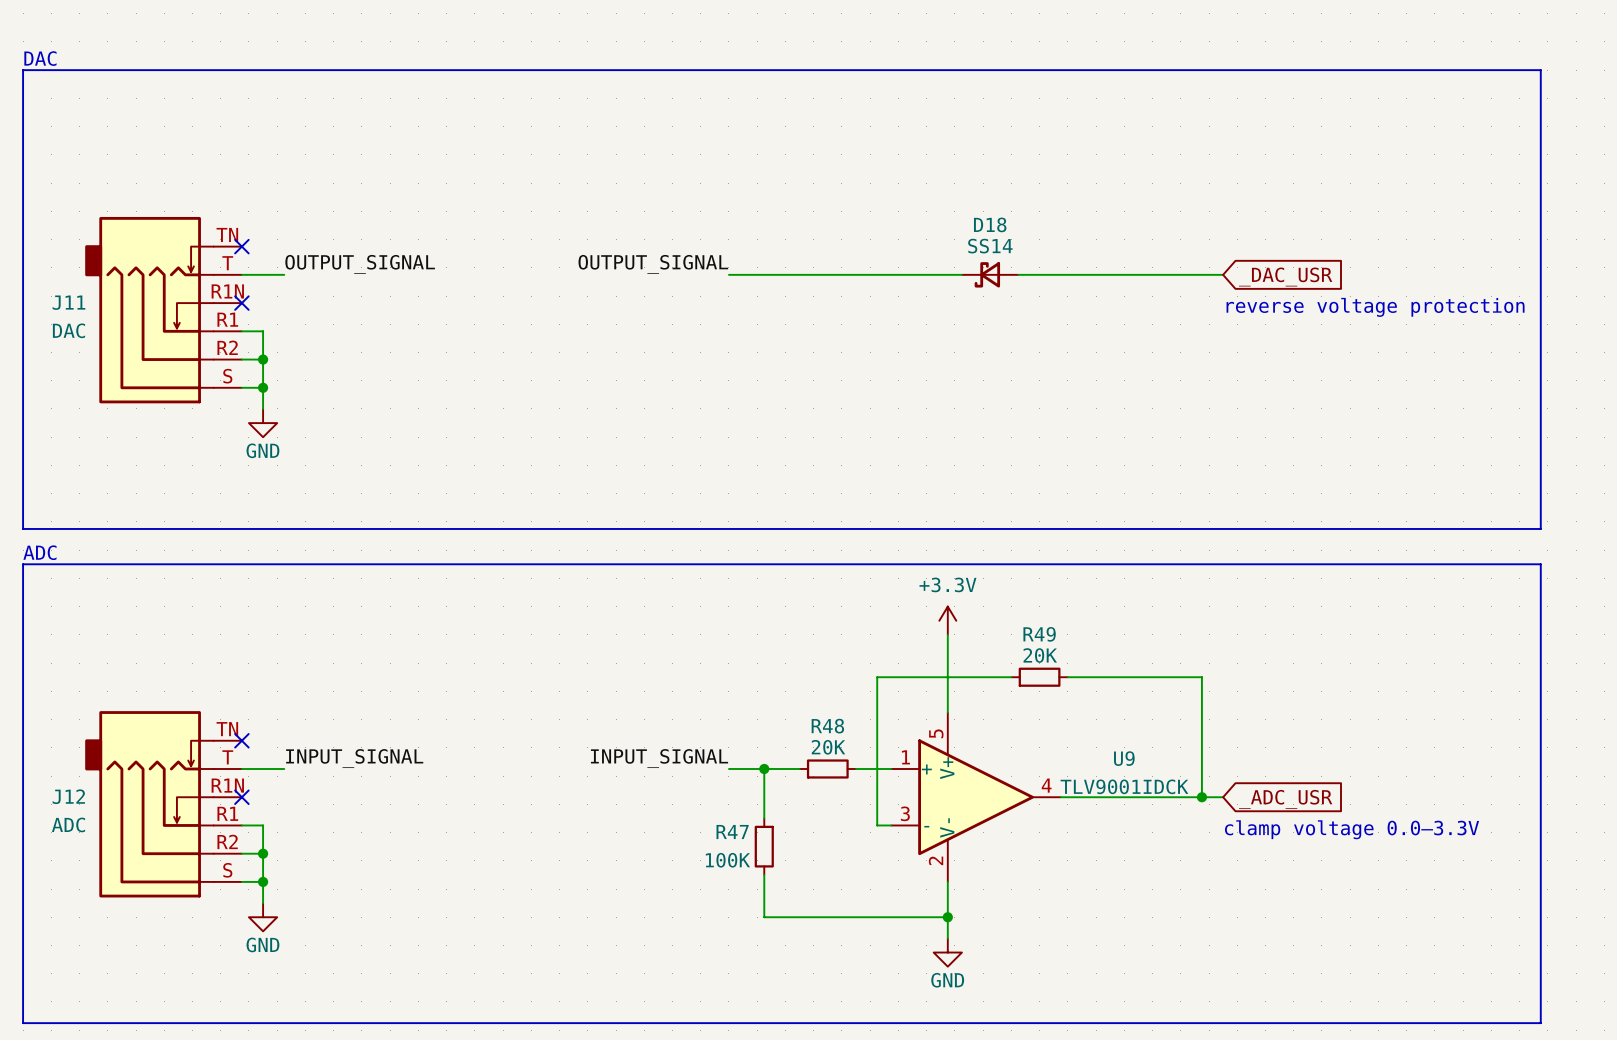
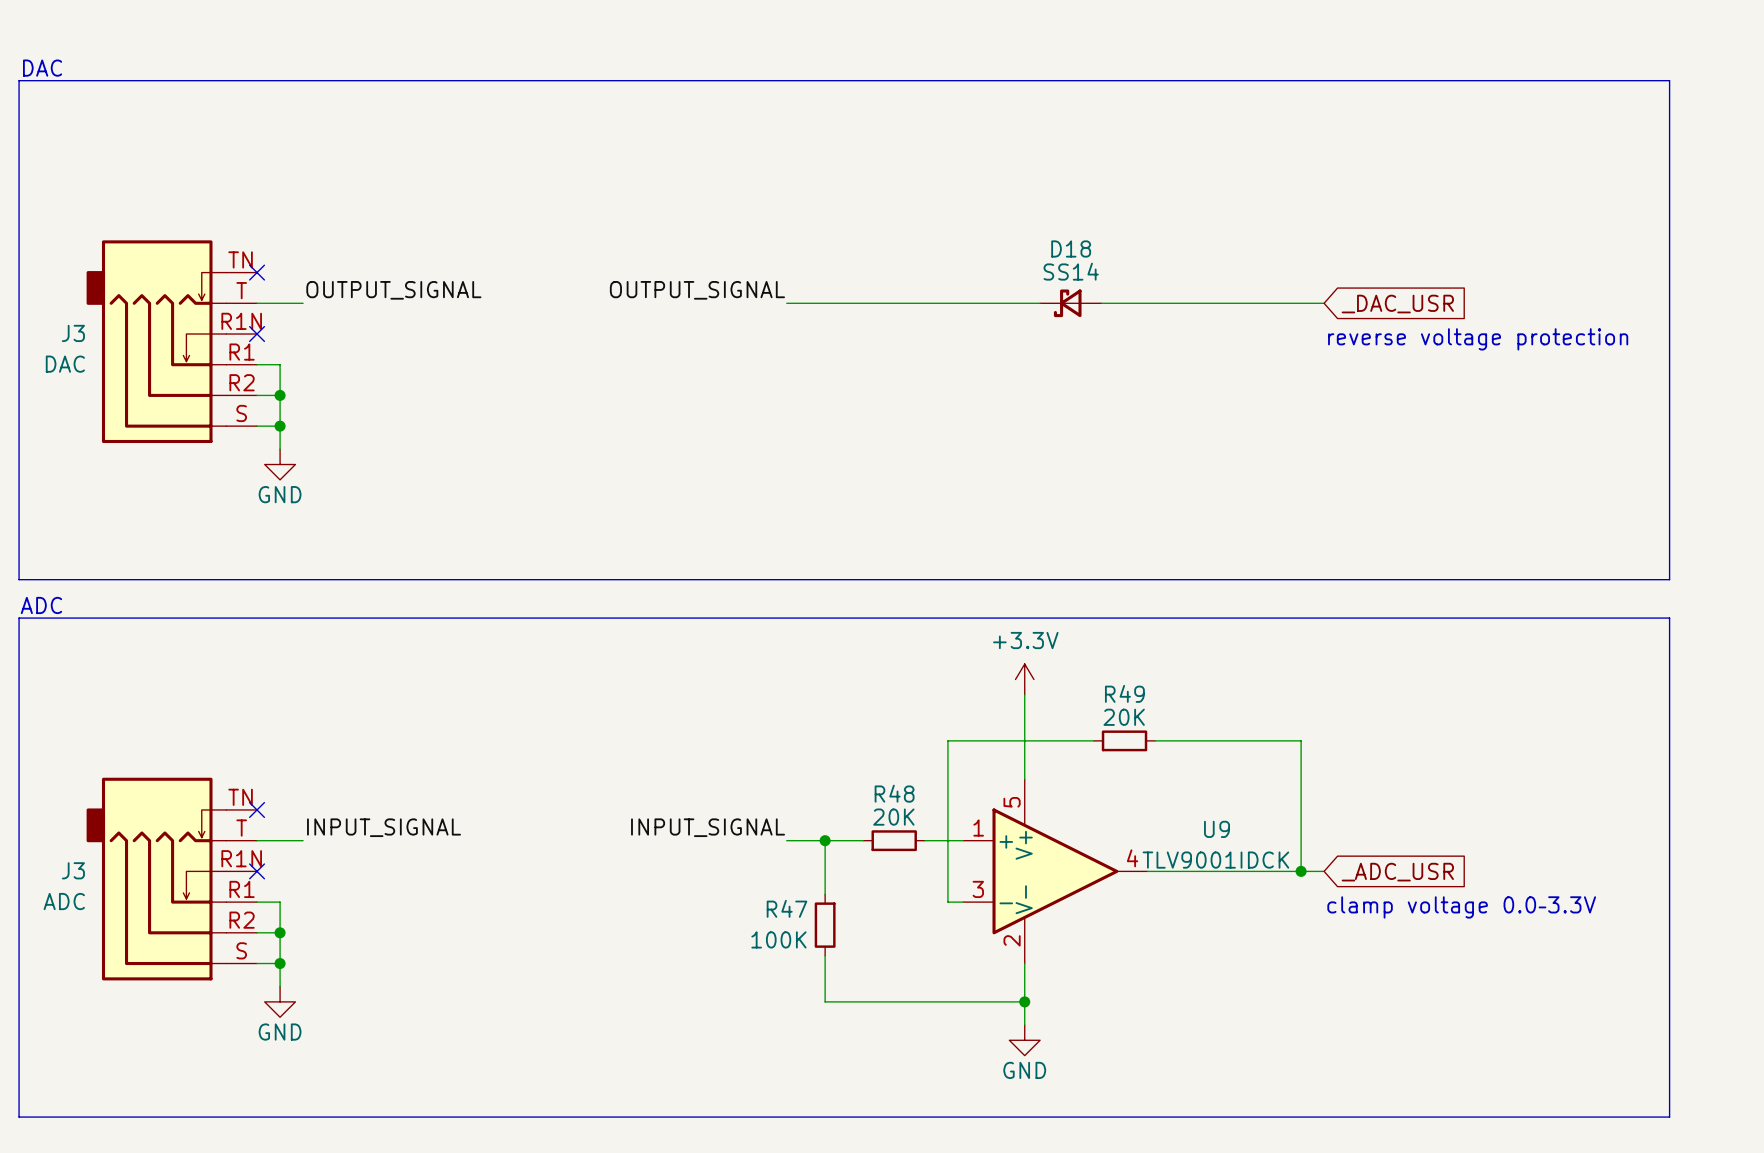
J11 name: J11 (68, 302) -> J3 (73, 333)
J12 name: J12 (68, 796) -> J3 (73, 870)

